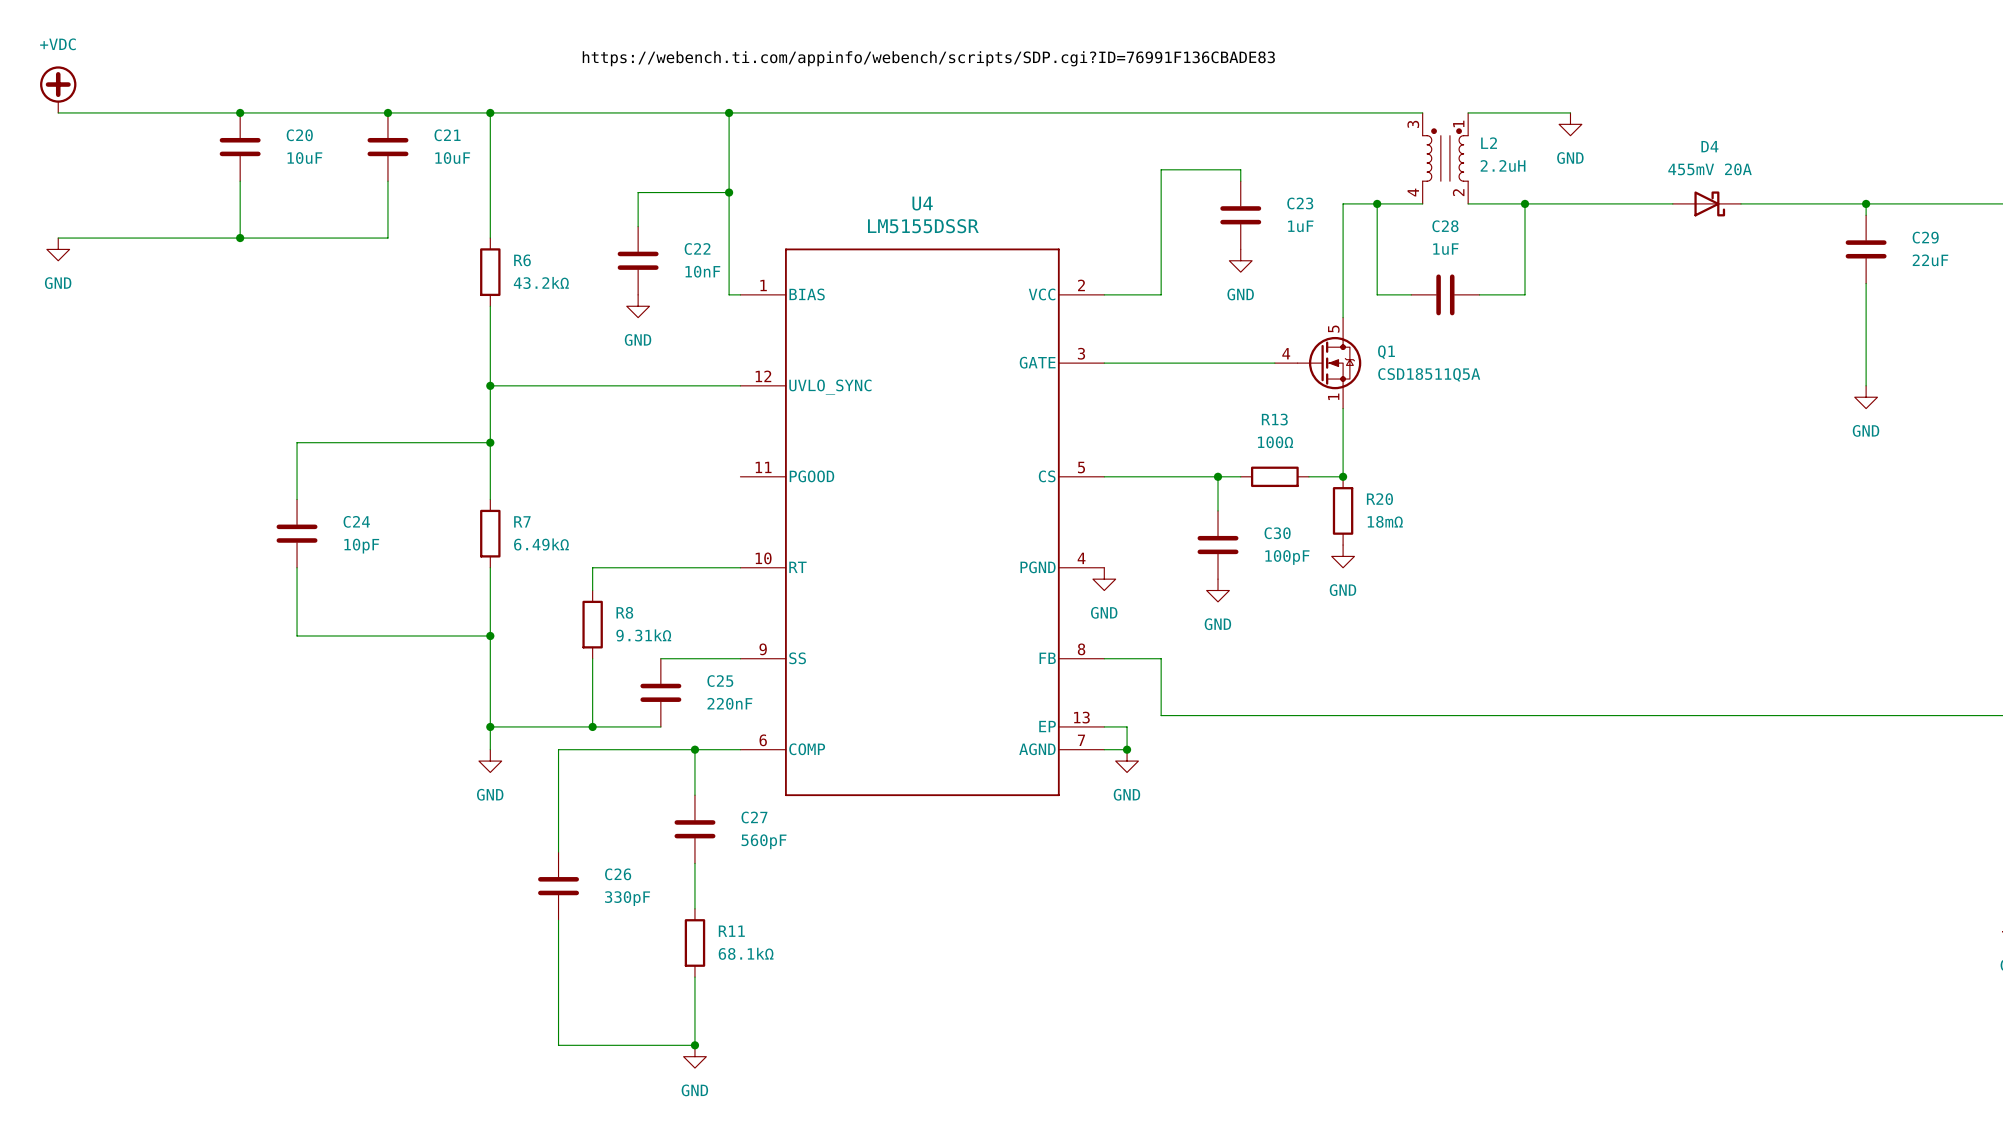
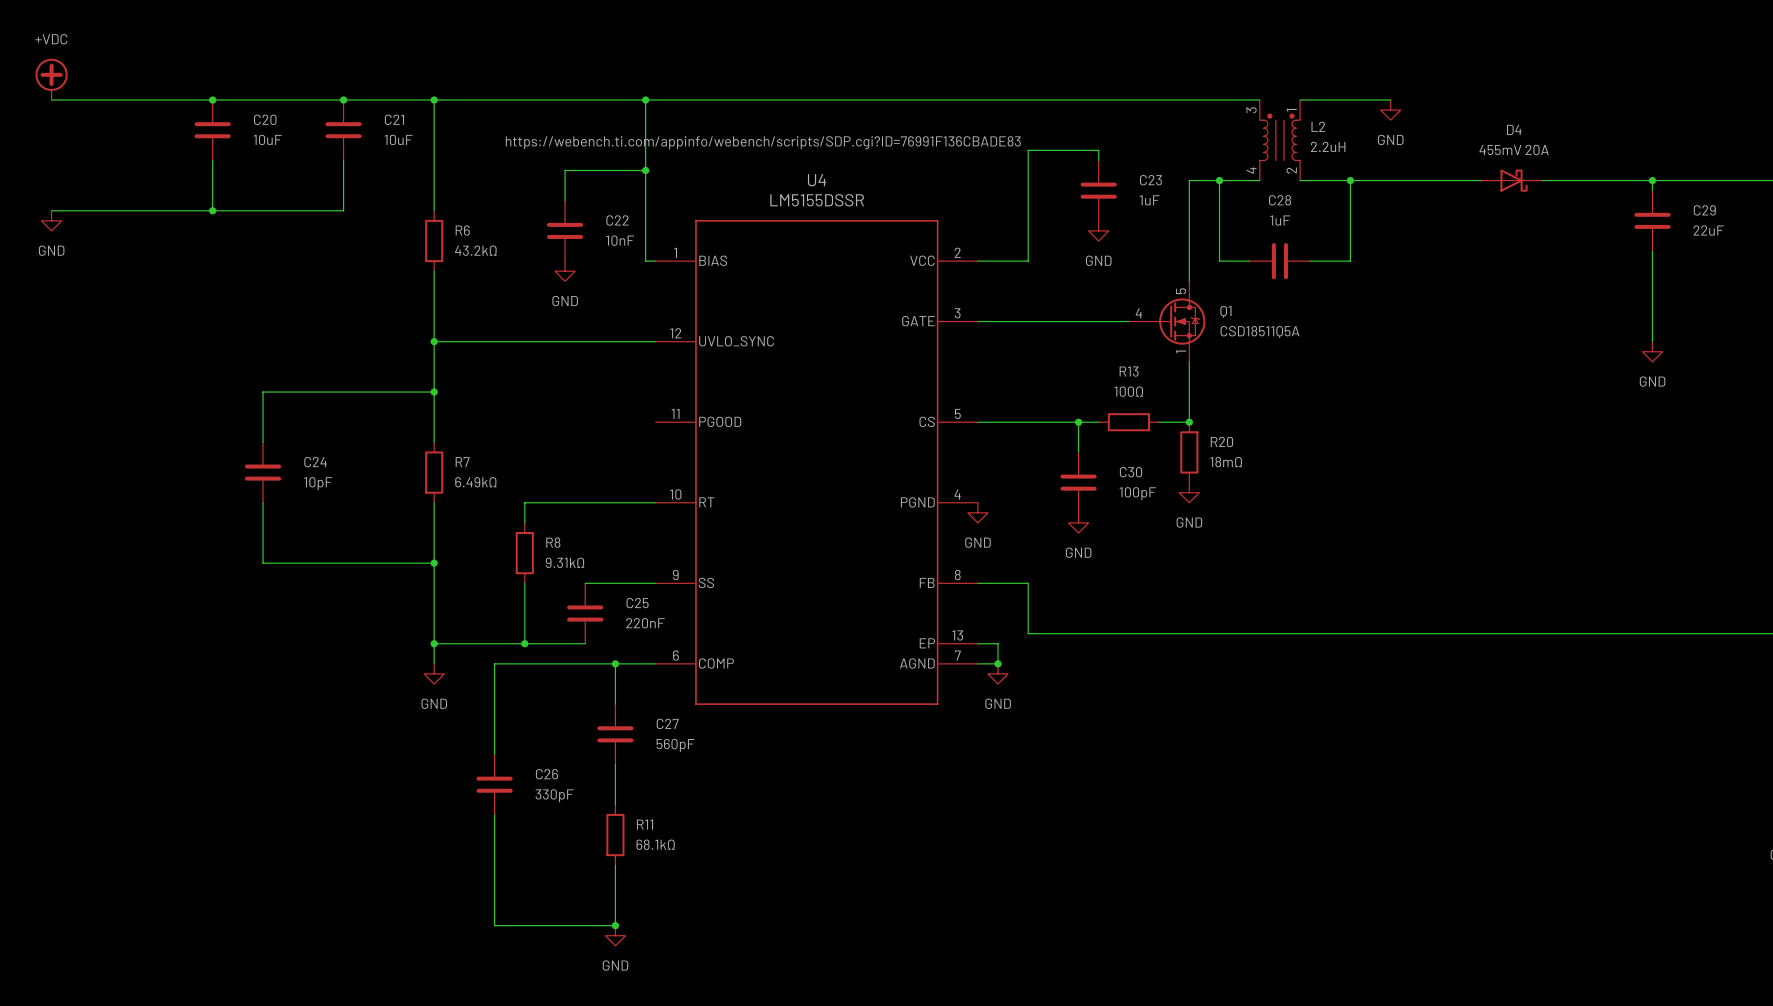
label position: https://webench.ti.com/appinfo/webench/scripts/SDP.cgi?ID=76991F136CBADE83 (928, 58) -> https://webench.ti.com/appinfo/webench/scripts/SDP.cgi?ID=76991F136CBADE83 (763, 142)

